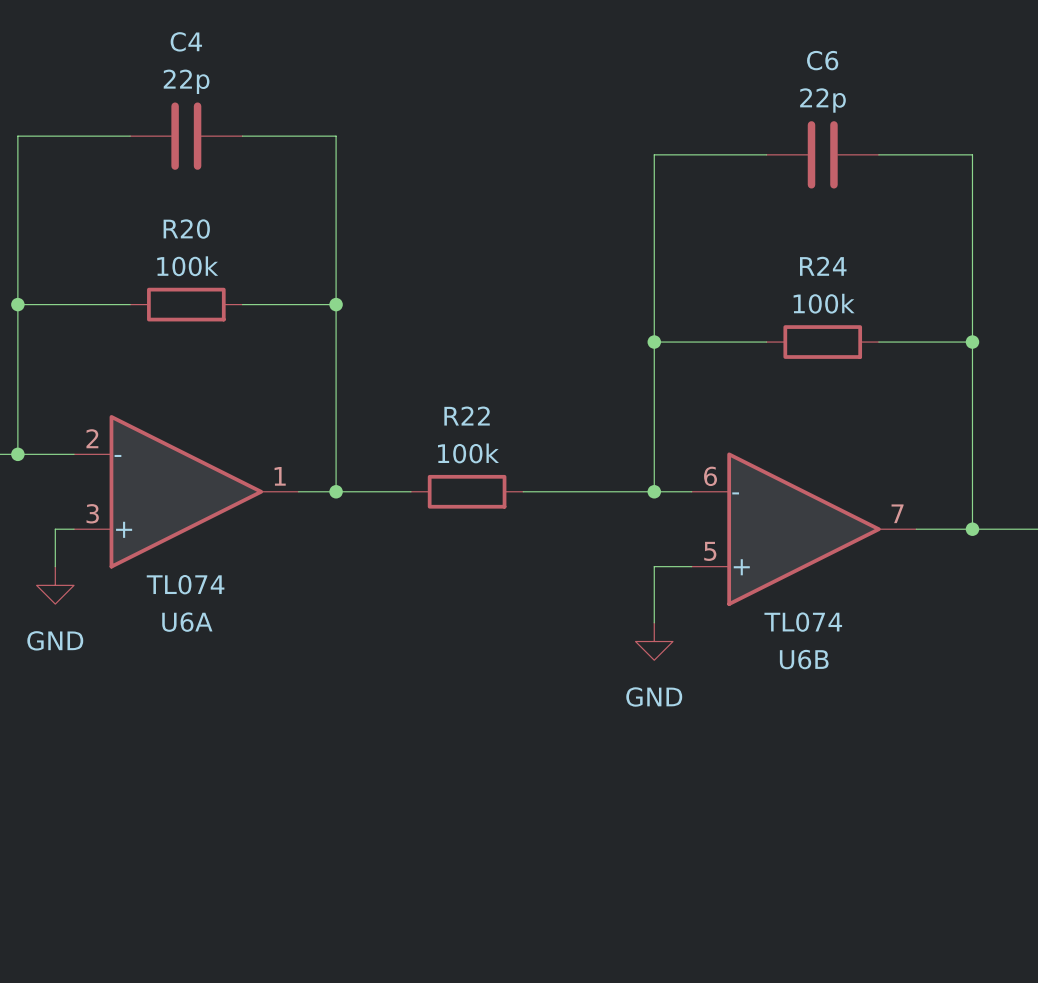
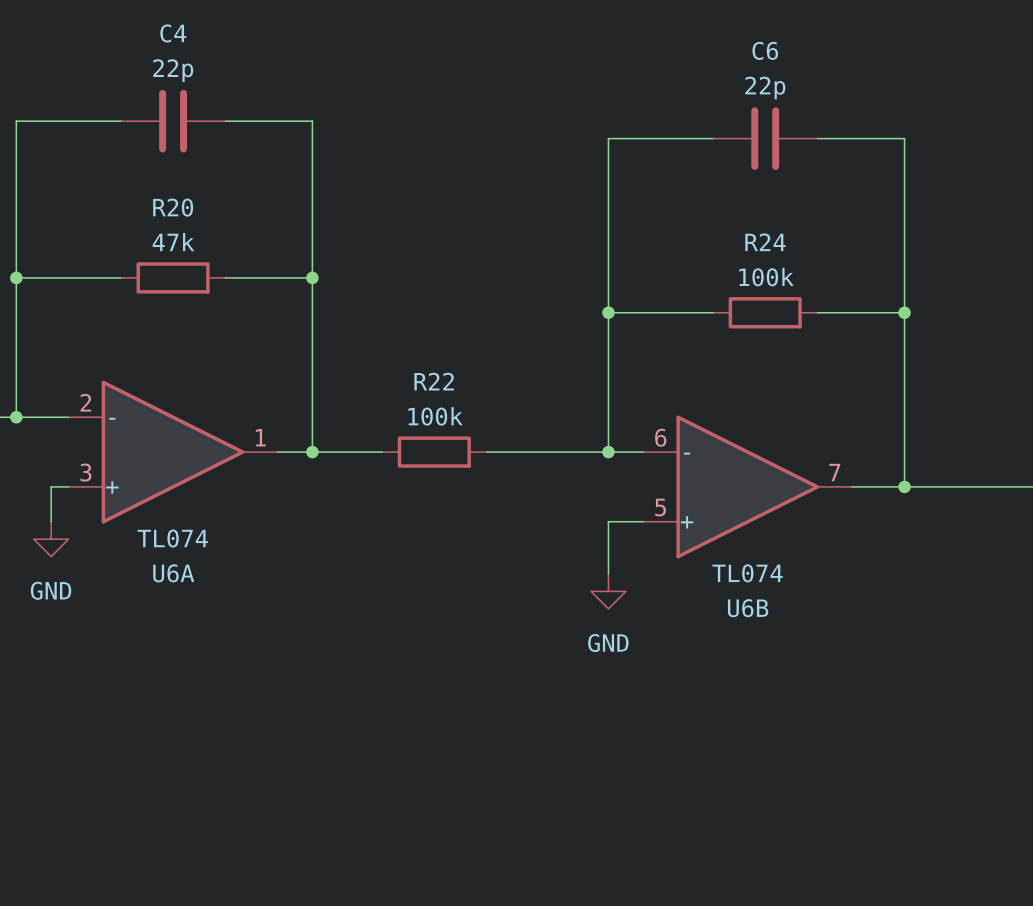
R20 value: 100k (187, 266) -> 47k (173, 242)

